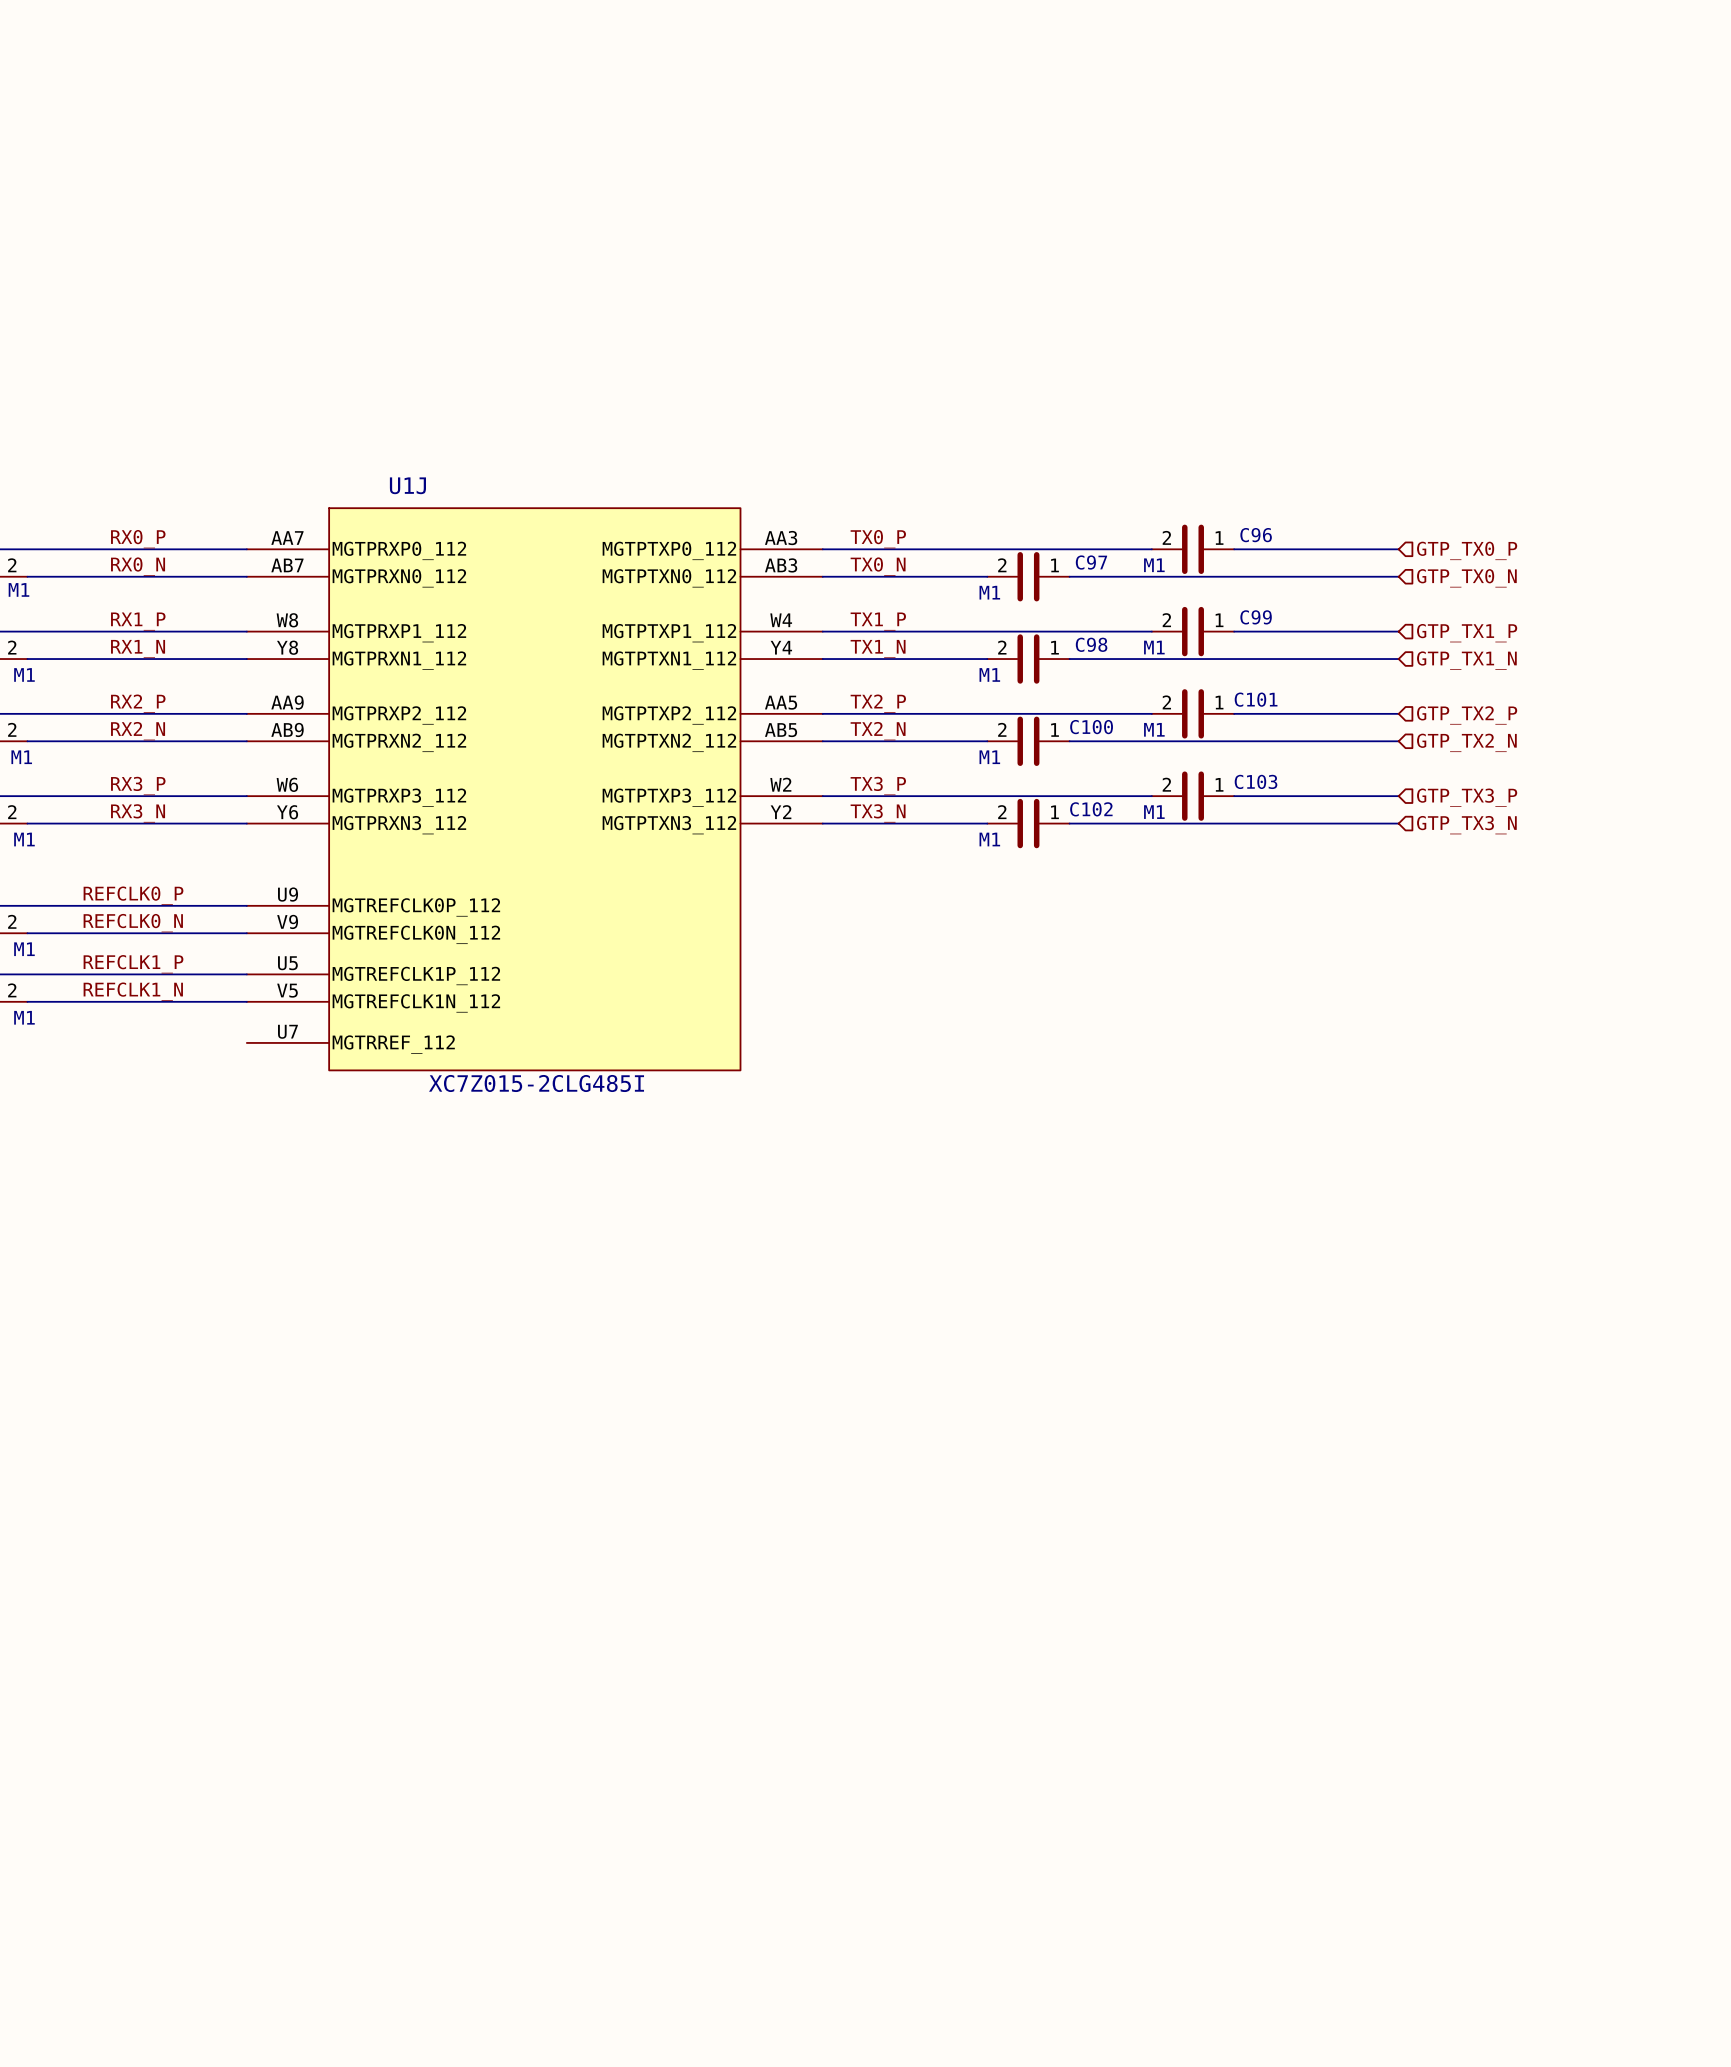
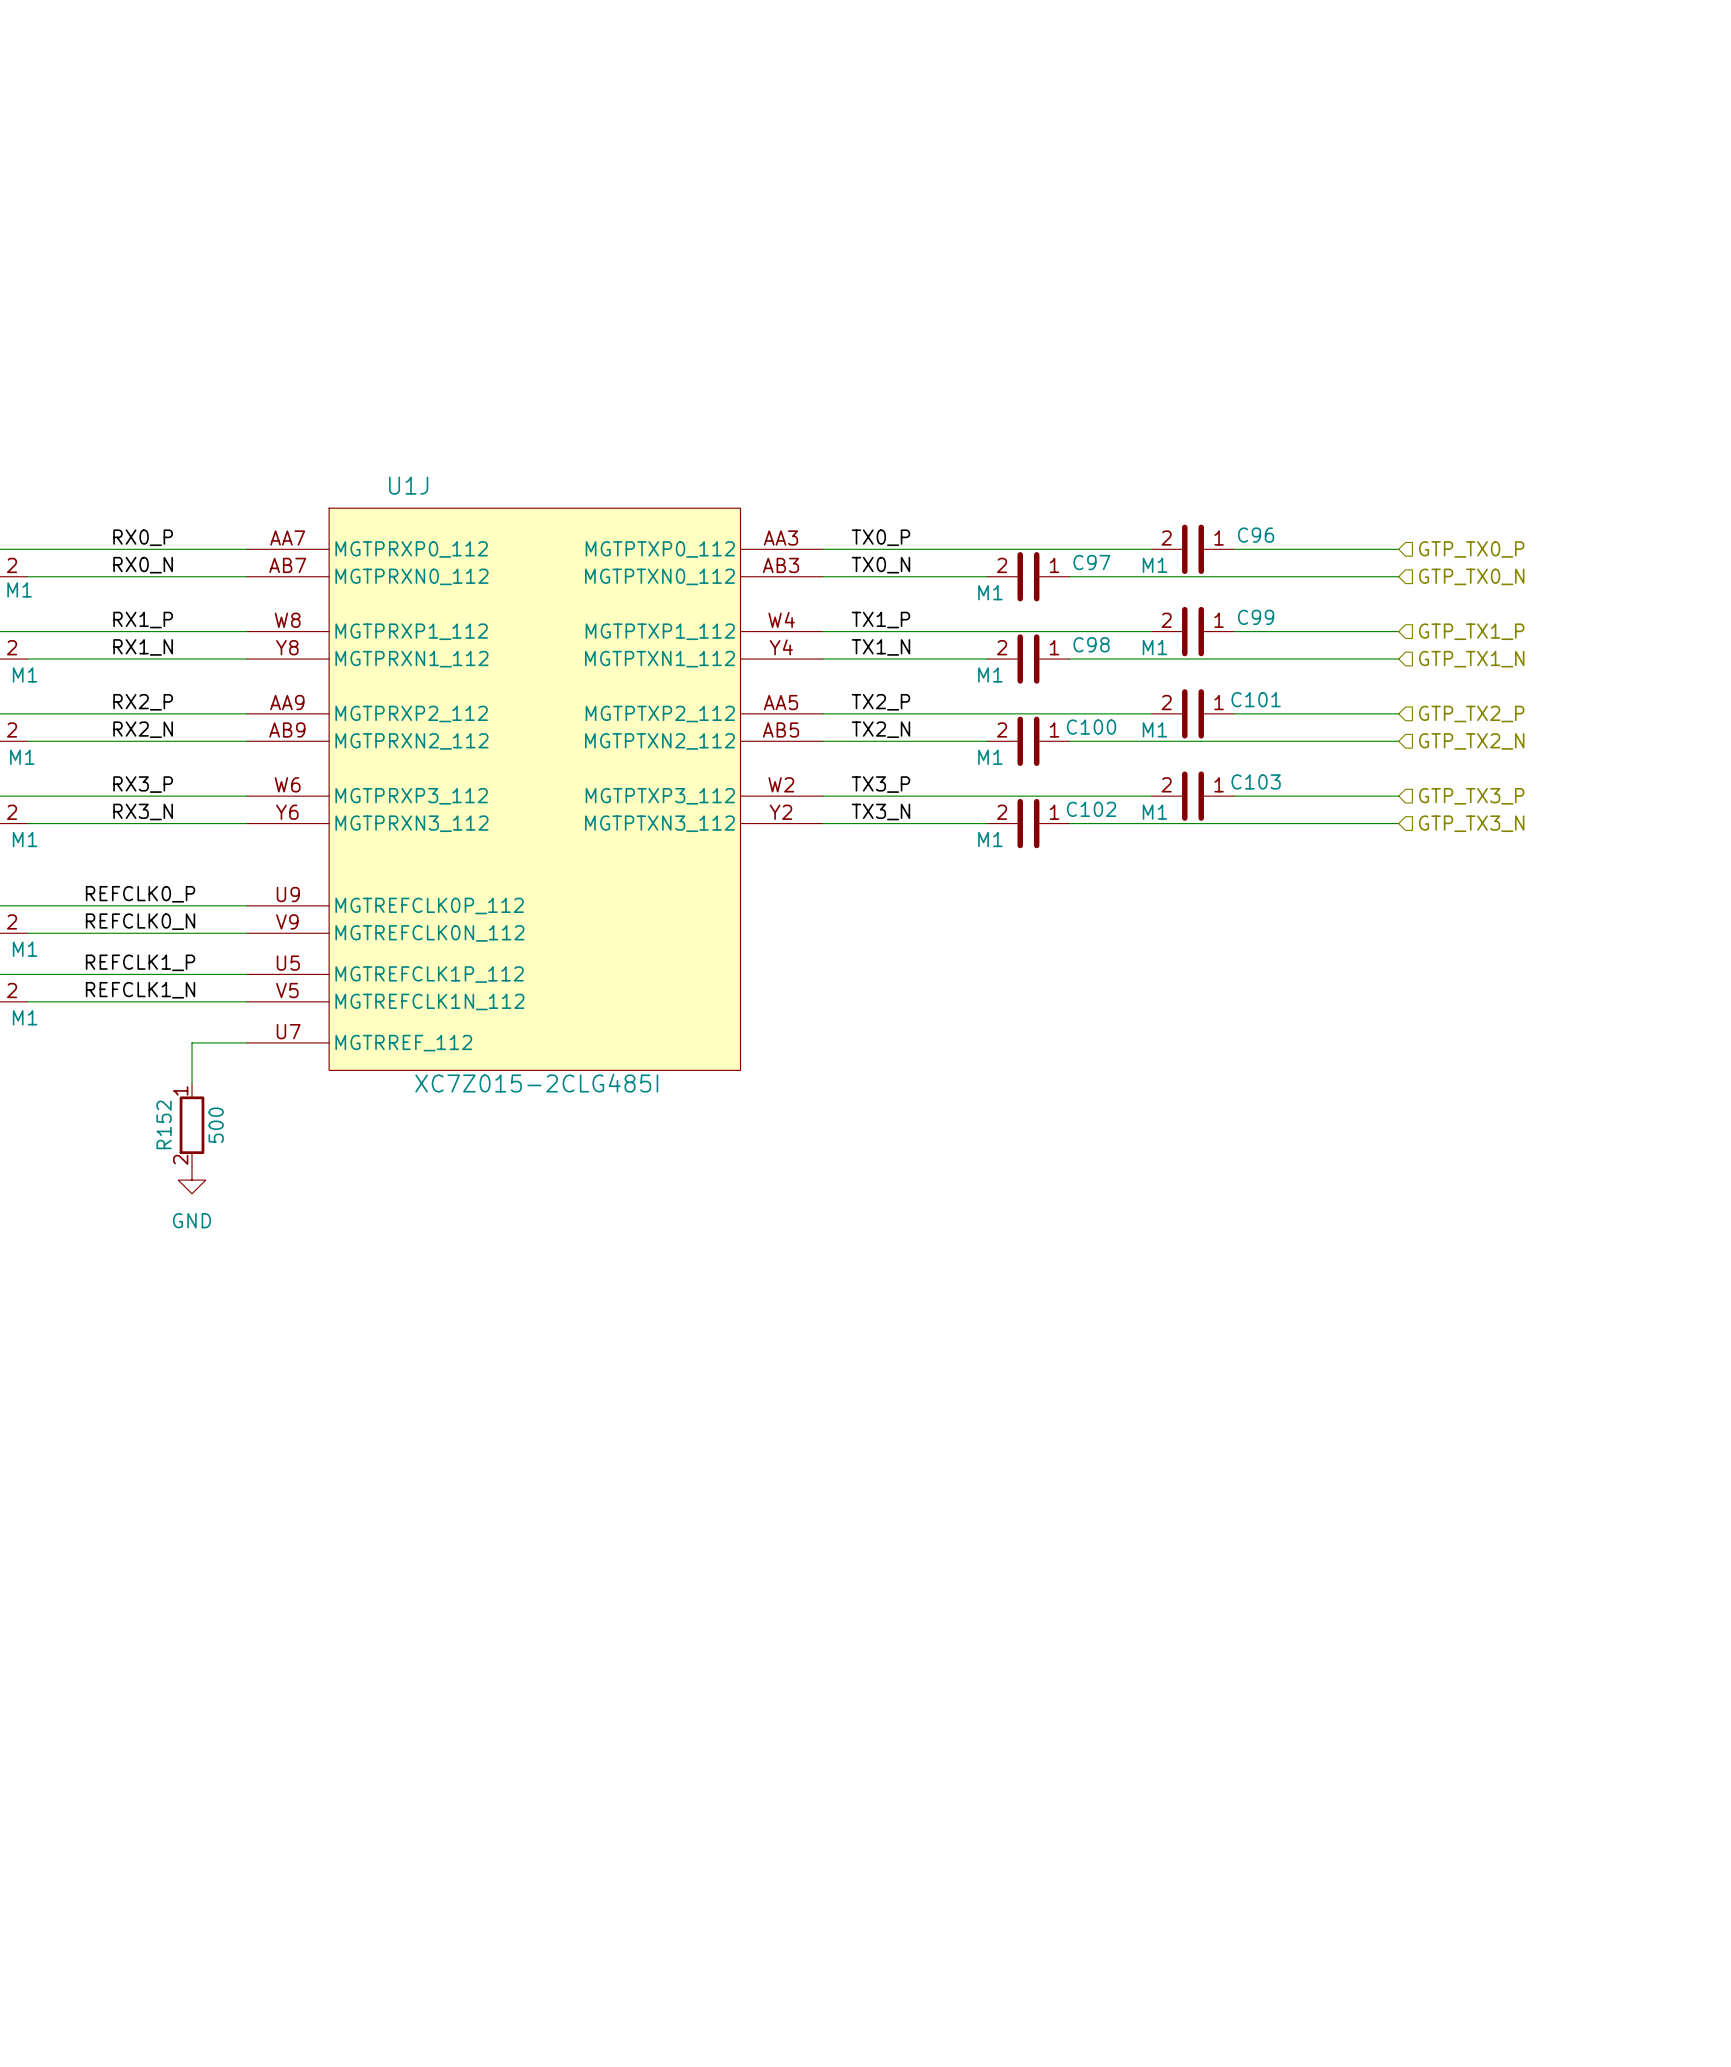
wire: none -> (246, 1042) (192, 1042) (192, 1084)
R152: none -> 500 (192, 1125)
power symbol: none -> GND (192, 1180)

